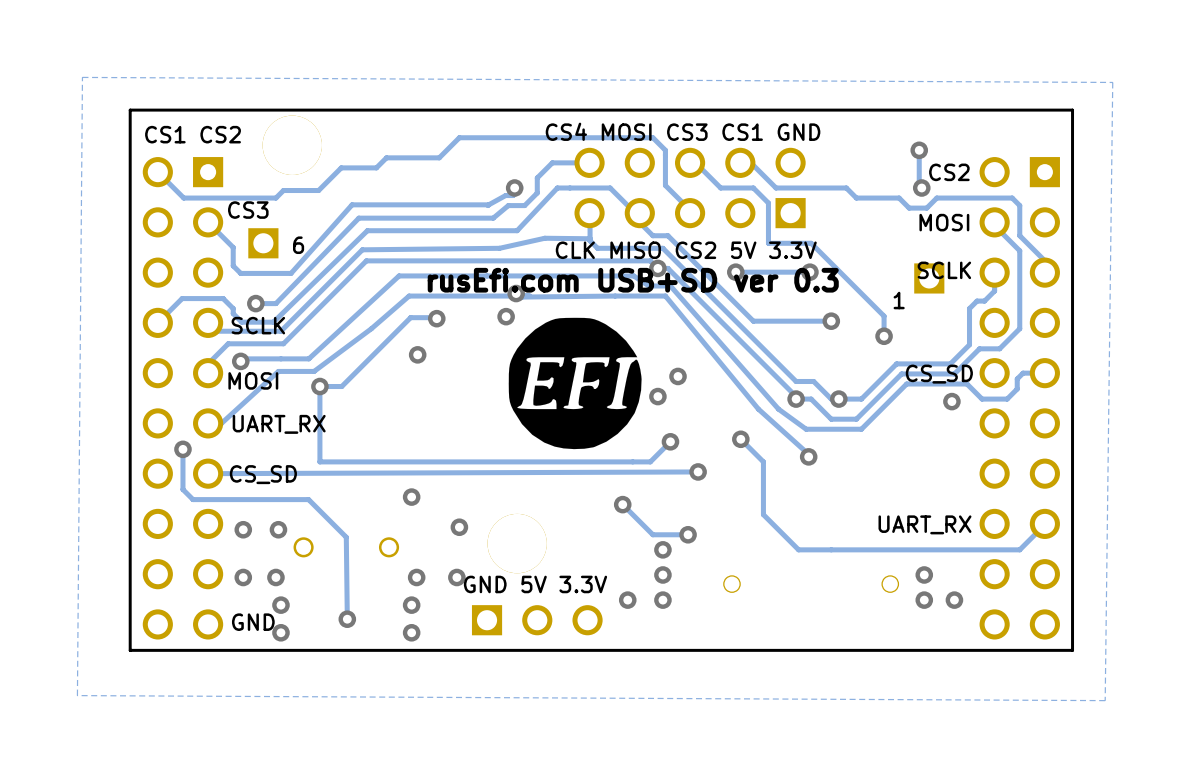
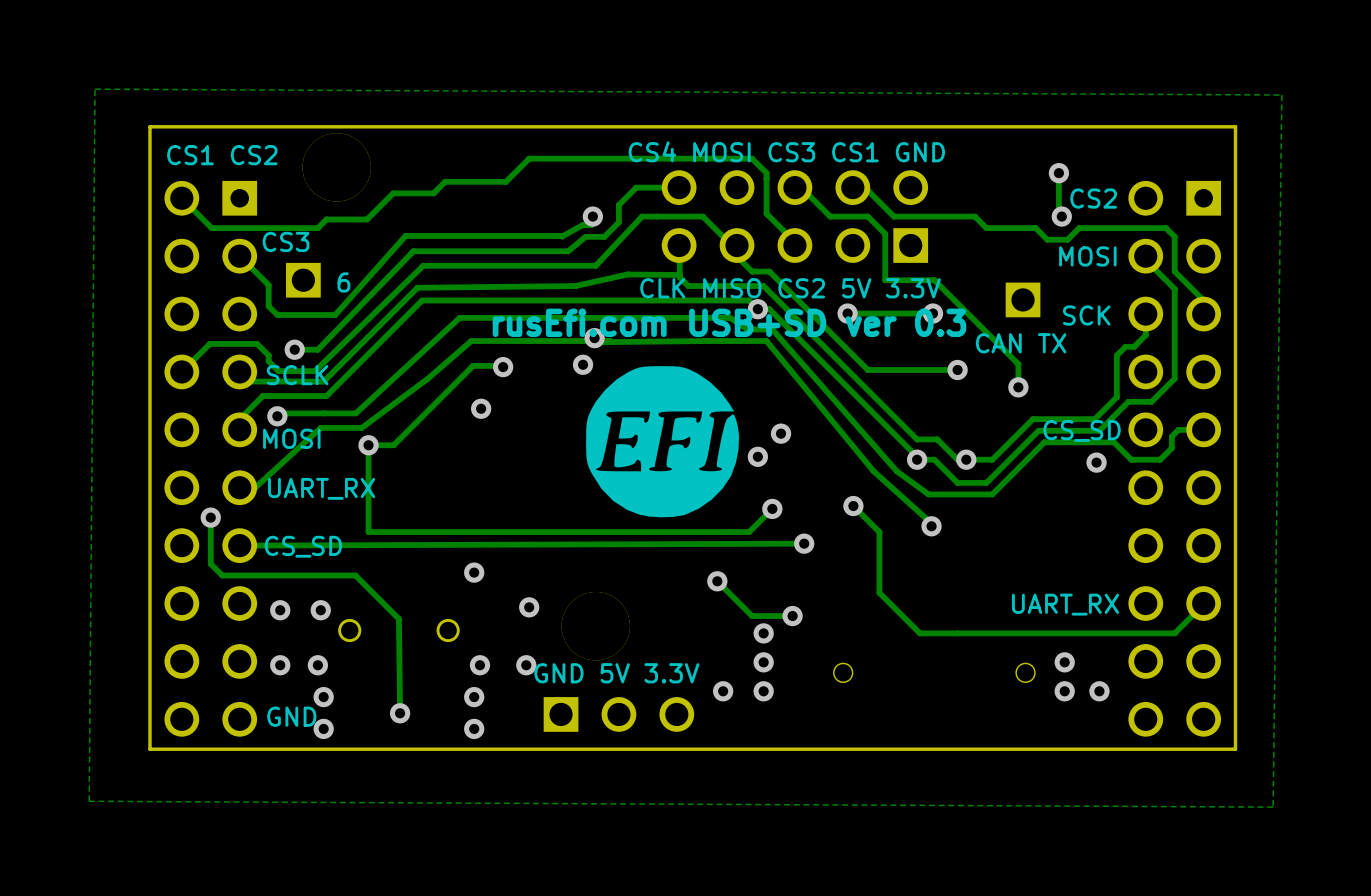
text: SCLK (944, 270) -> SCK (1086, 315)
part position: (929, 278) -> (1023, 299)
text: 1 (899, 300) -> CAN TX (1021, 343)

